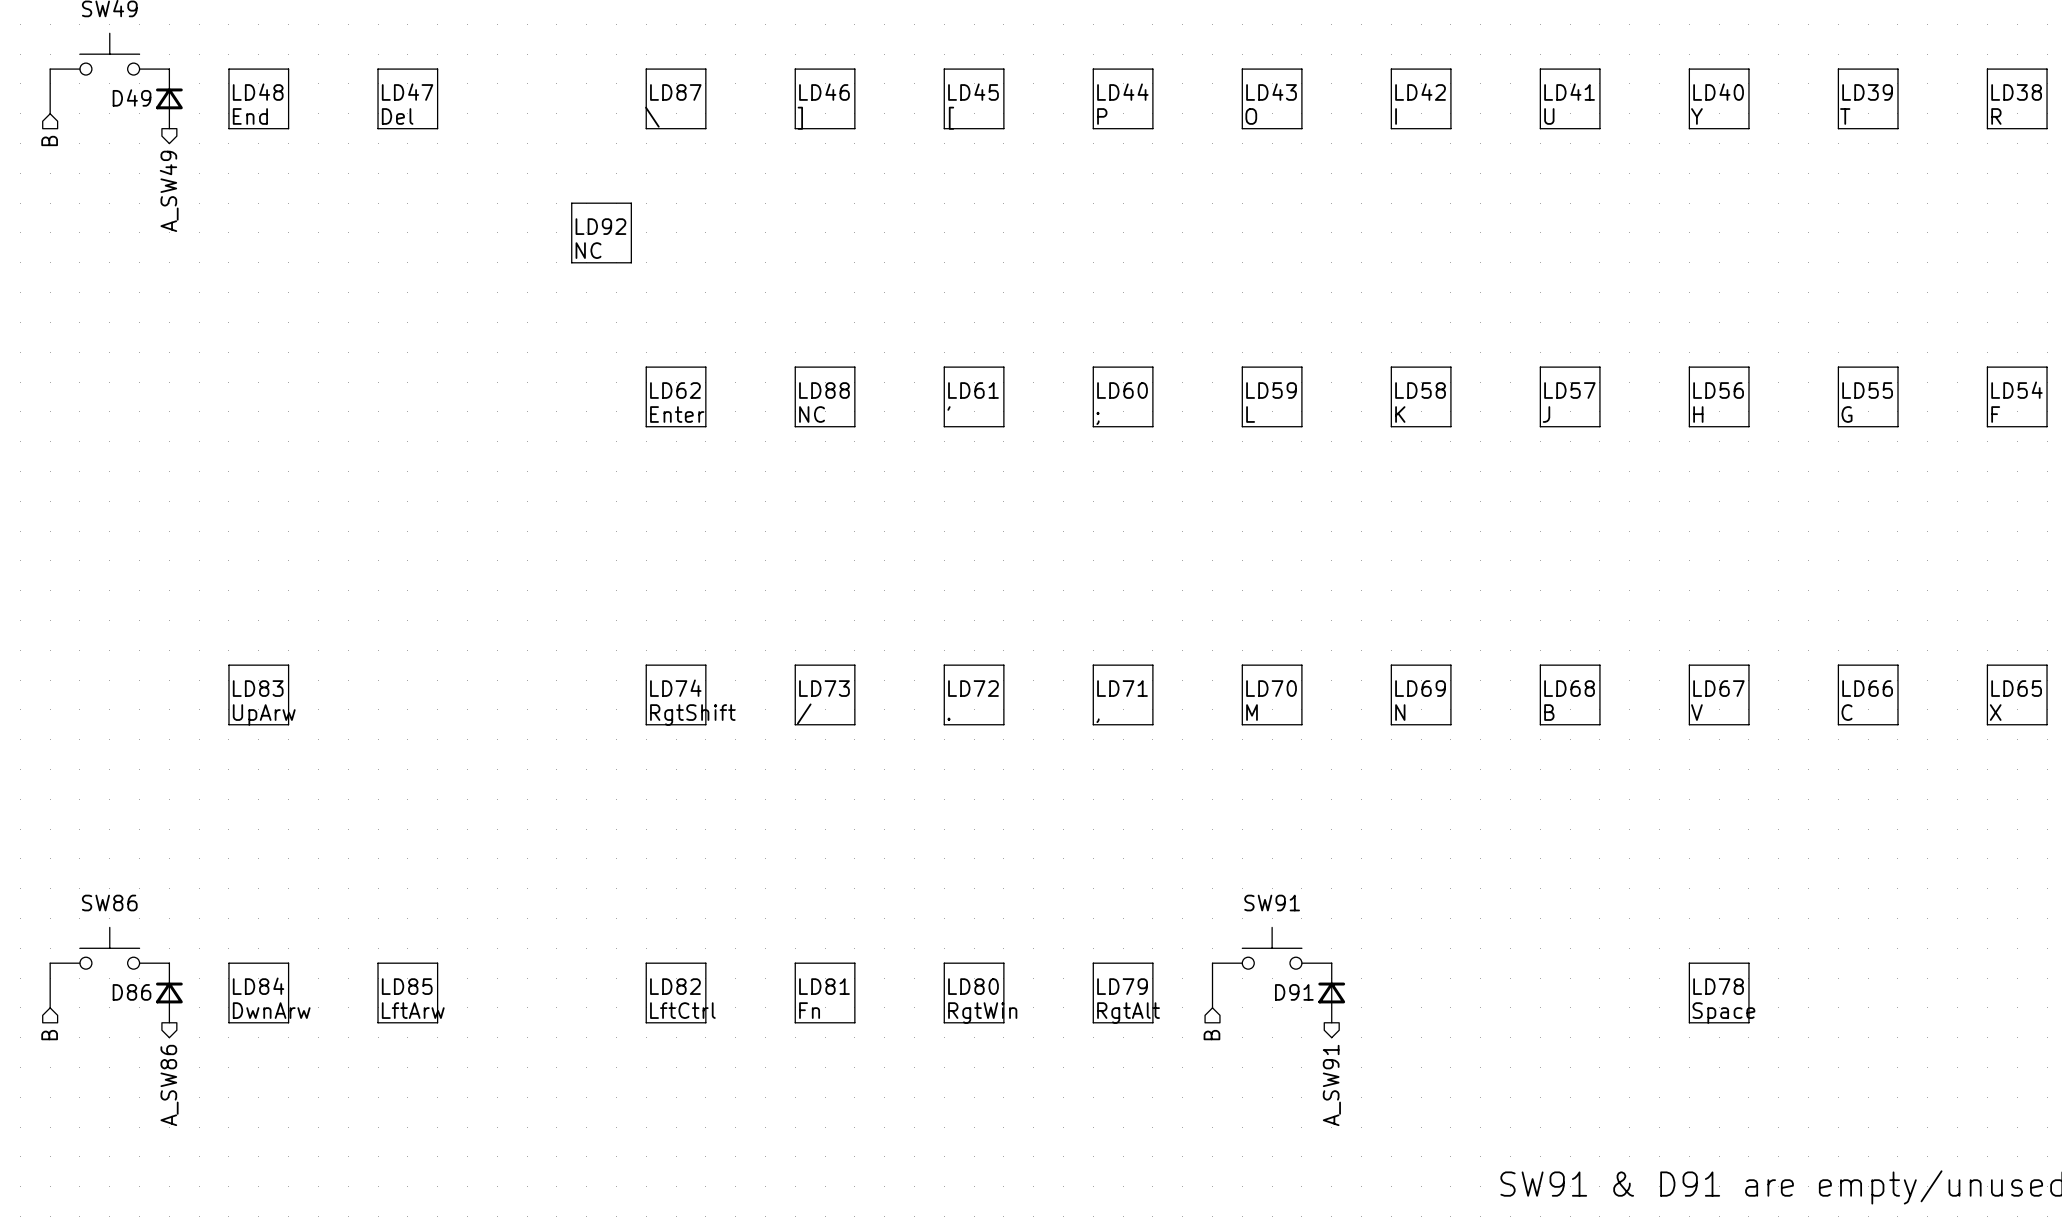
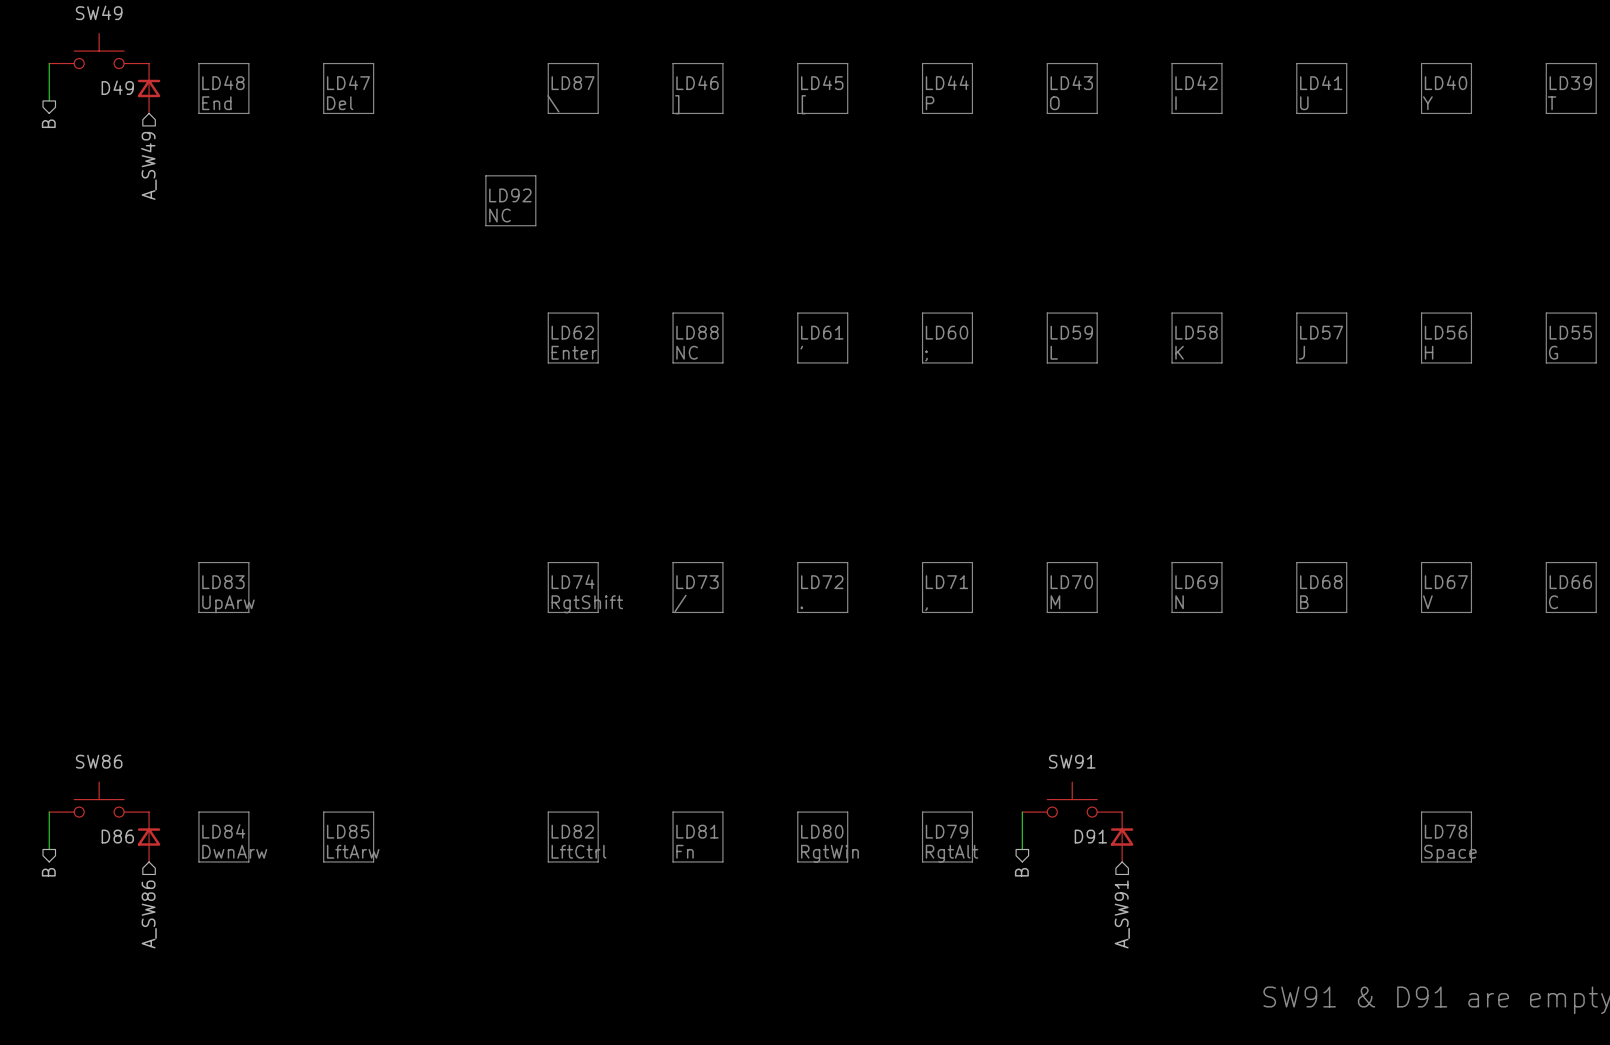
hierarchical label shape: input (49, 140) -> output (48, 123)
hierarchical label shape: output (169, 191) -> input (148, 165)
hierarchical label shape: input (49, 1035) -> output (48, 872)
hierarchical label shape: input (1211, 1035) -> output (1021, 872)
hierarchical label shape: output (169, 1085) -> input (149, 914)
hierarchical label shape: output (1331, 1085) -> input (1122, 914)

